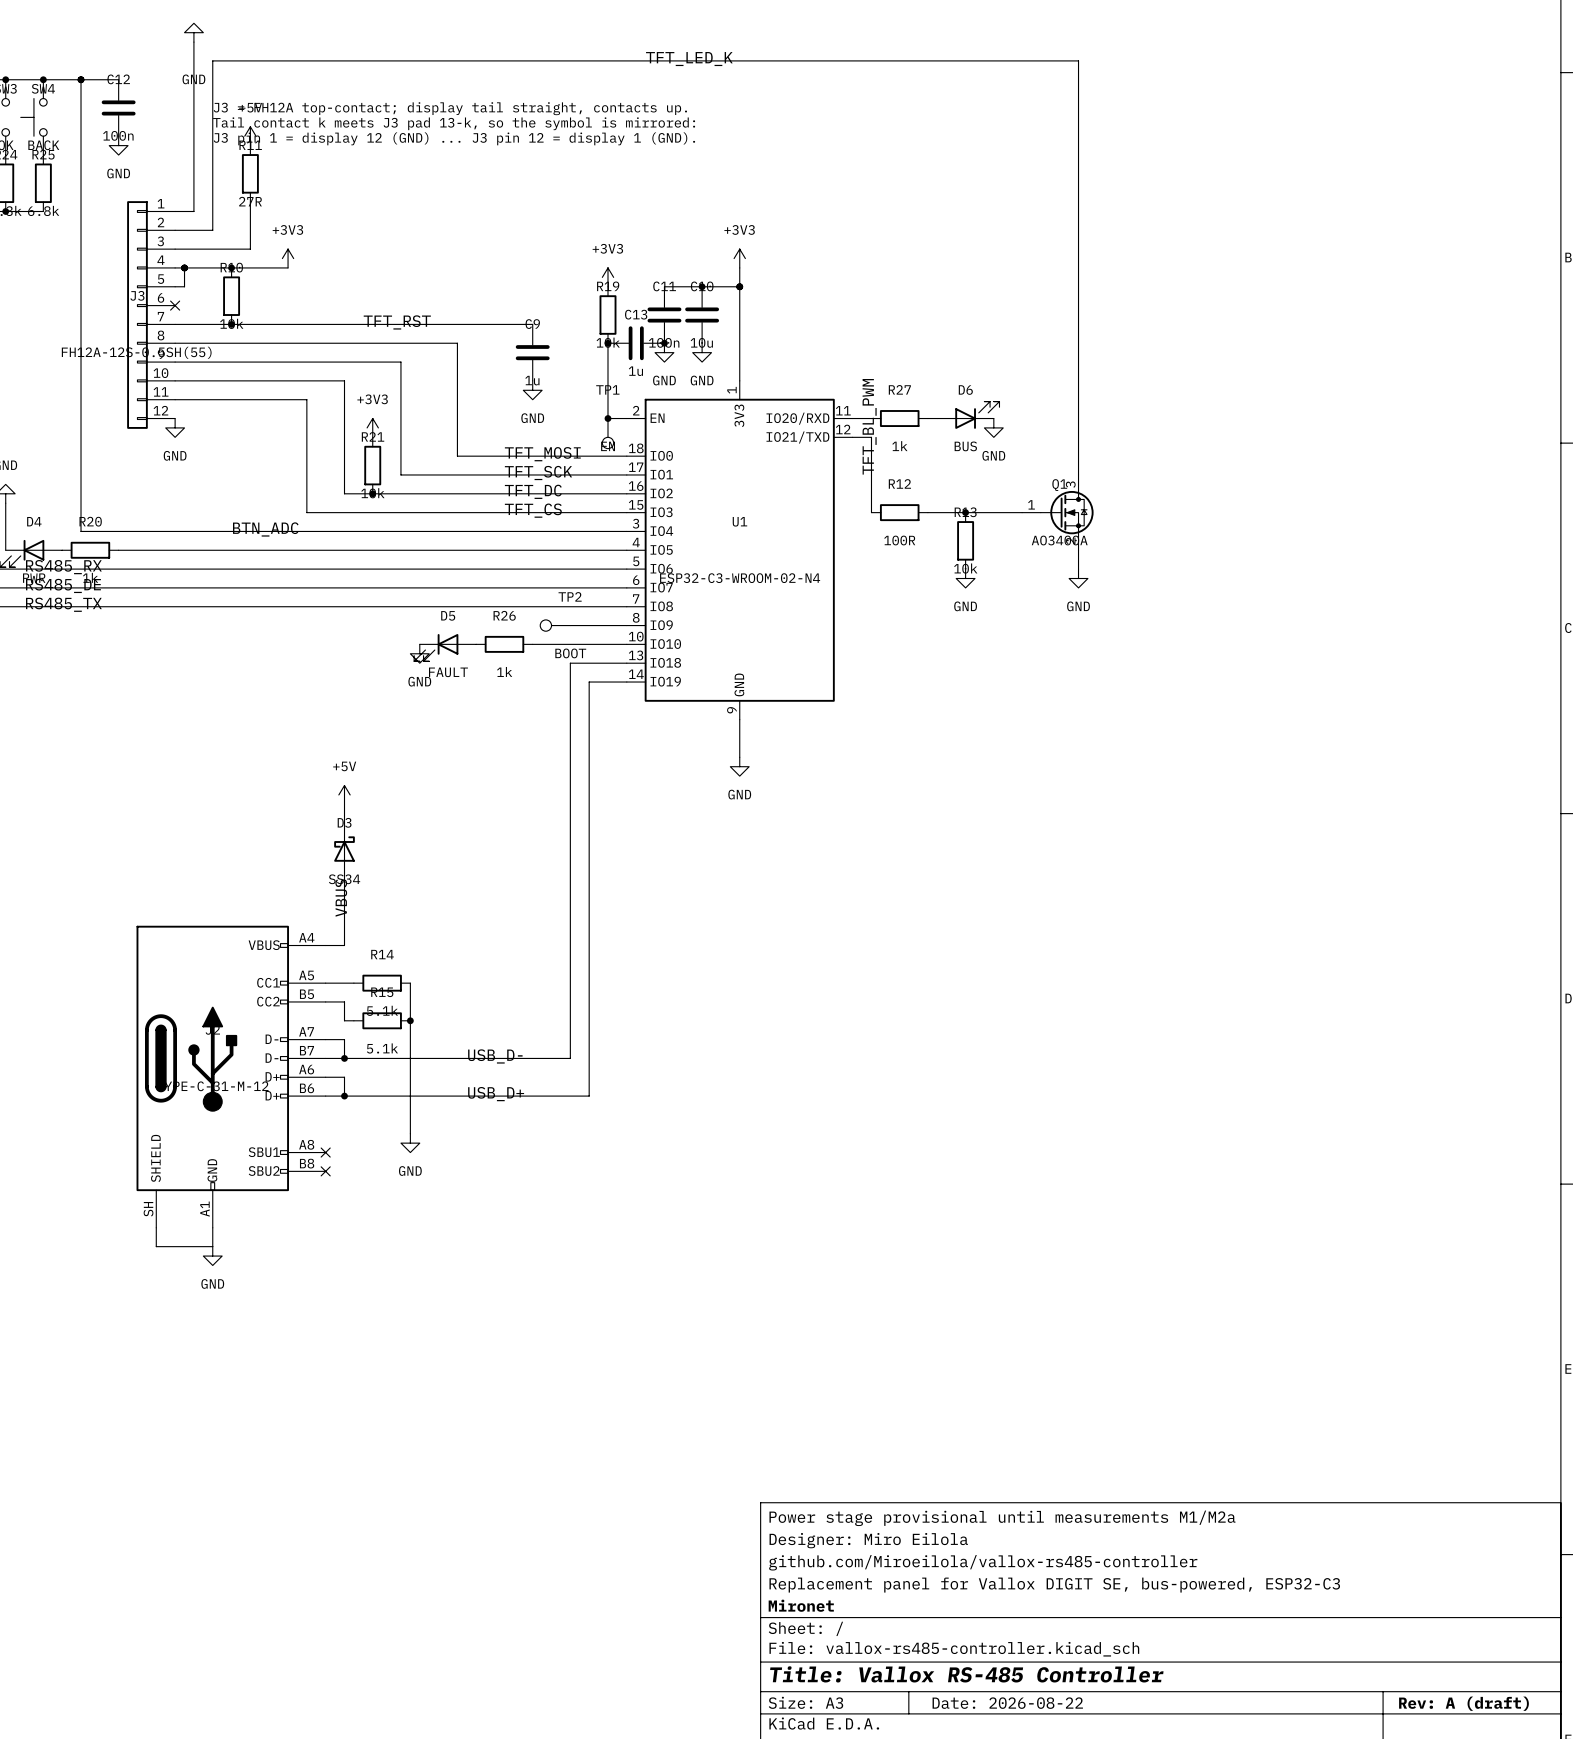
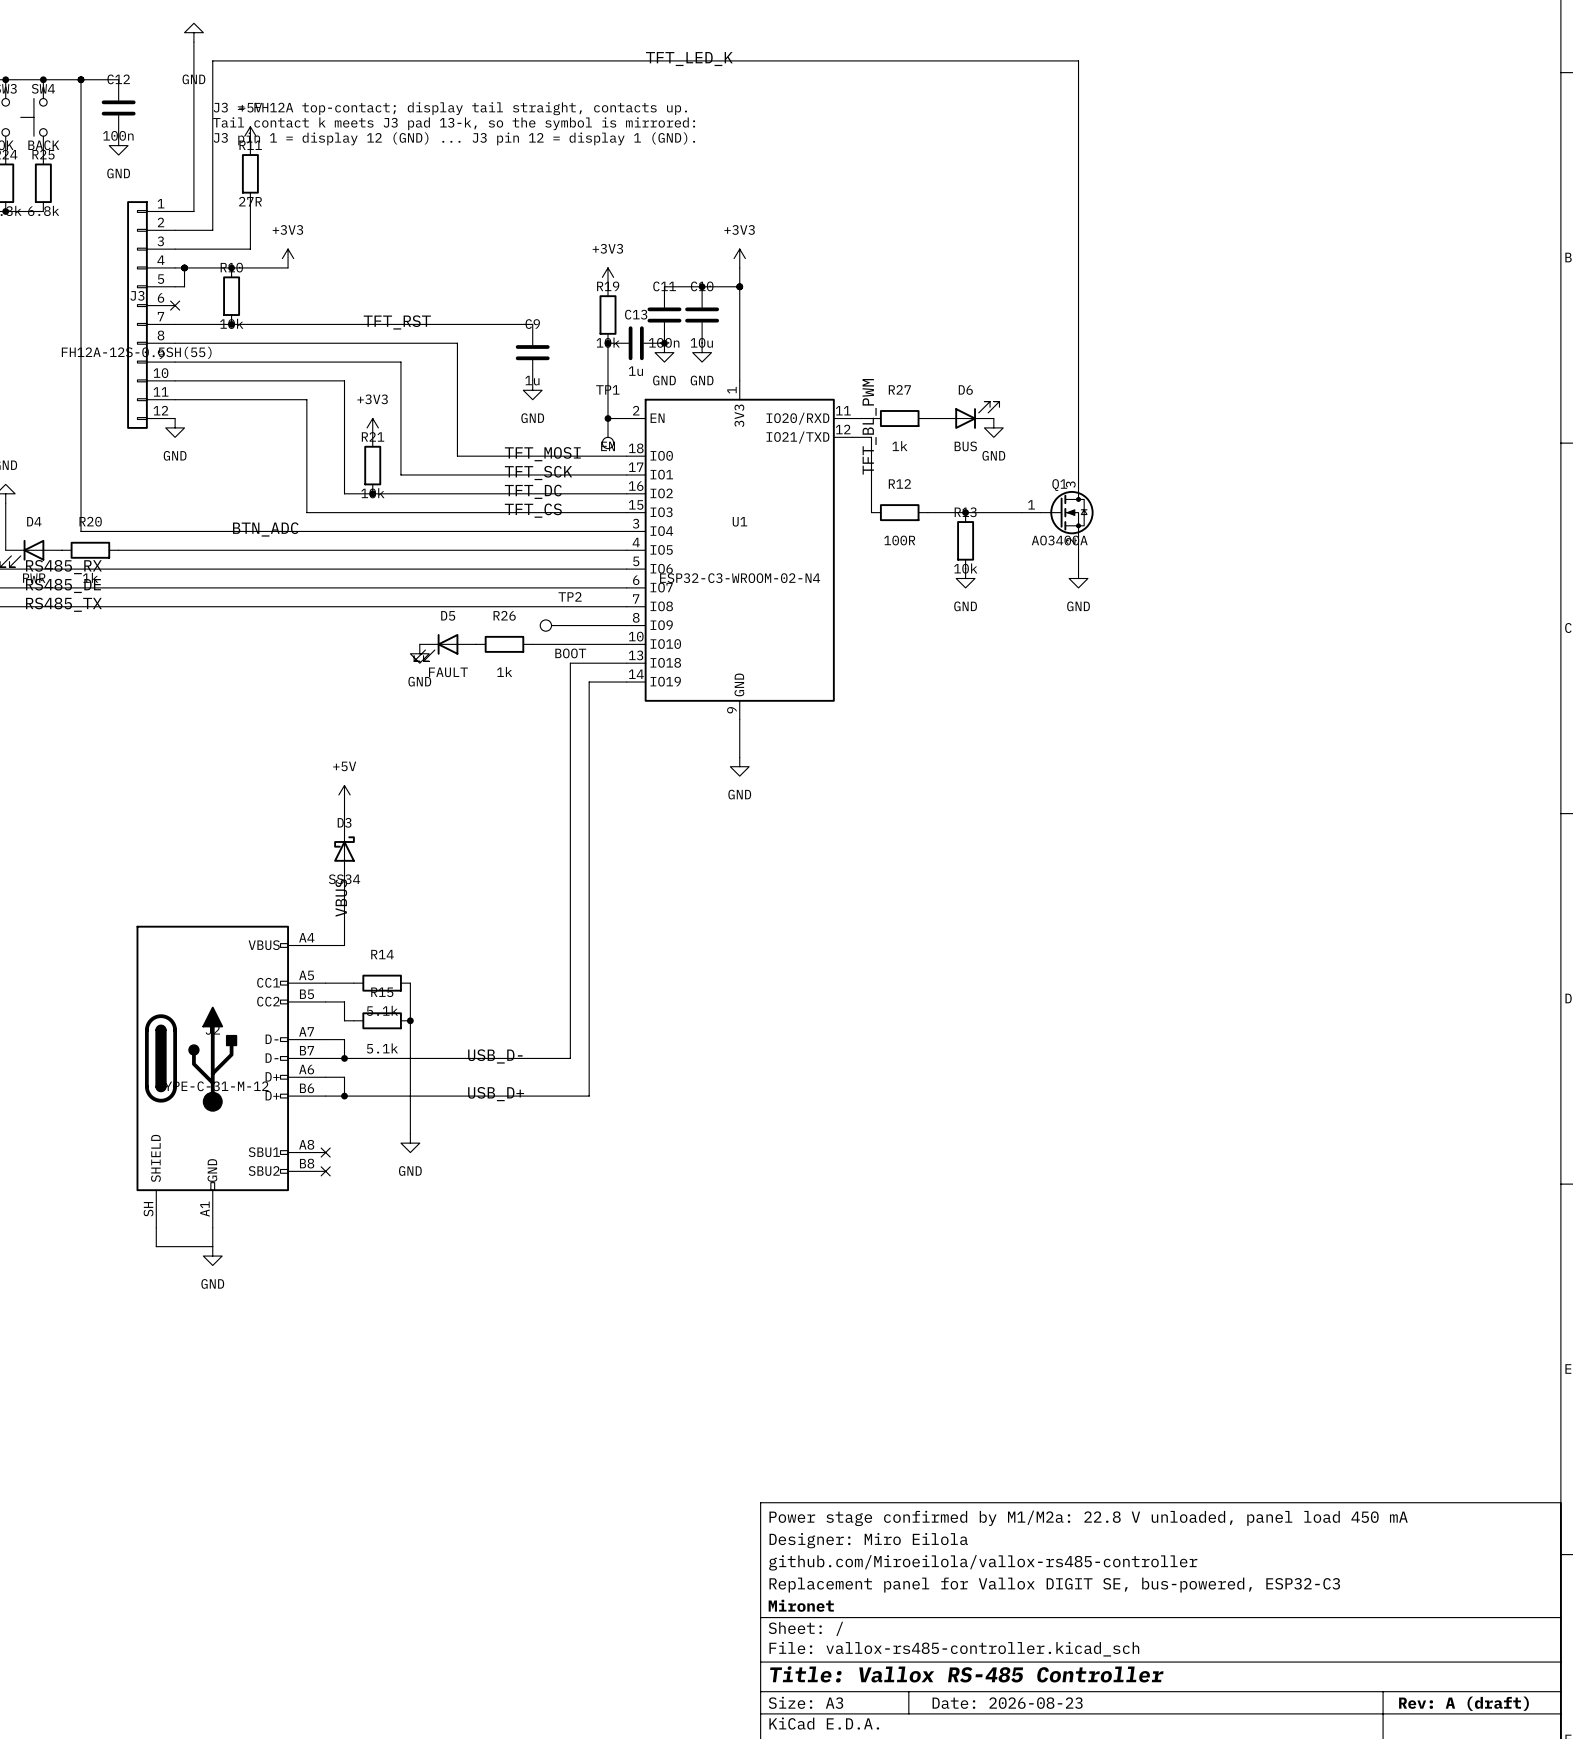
title block: Power stage provisional until measurements M1/M2a (1002, 1518) -> Power stage confirmed by M1/M2a: 22.8 V unloaded, panel load 450 mA (1088, 1518)
title block: Date: 2026-08-22 (1007, 1703) -> Date: 2026-08-23 (1007, 1703)

